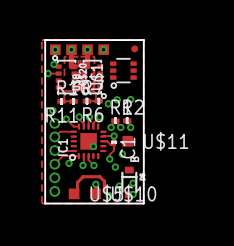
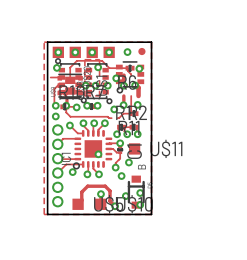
track: (71, 49) (71, 66) (74, 66) -> none
track: (87, 49) (87, 66) (84, 66) -> none
via: none -> (127, 52)
zone outline: (64, 56) (78, 56) (78, 90) (64, 90) (64, 56) -> none
via: none -> (98, 67)
track: none -> (115, 68) (109, 68) (102, 60) (76, 60) (70, 67) (70, 80) (72, 78) (80, 78)
track: none -> (121, 68) (127, 68) (131, 75)
via: none -> (139, 68)
track: (100, 66) (93, 69) (93, 90) (96, 93) (96, 101) (89, 101) -> none
track: none -> (123, 75) (123, 85) (125, 85)
via: (48, 73) -> none
via: none -> (116, 78)
track: none -> (59, 85) (54, 89) (55, 105)
via: none -> (85, 85)
via: none -> (95, 85)
via: none -> (107, 85)
via: none -> (123, 85)
track: none -> (135, 85) (138, 87) (138, 95)
via: none -> (135, 85)
part: none -> (72, 88)
track: none -> (70, 91) (66, 95) (66, 112) (70, 116) (111, 118)
track: none -> (123, 95) (123, 100)
track: none -> (131, 95) (131, 113) (123, 113) (117, 118)
via: none -> (55, 105)
via: none -> (66, 105)
via: none -> (87, 105)
via: none -> (97, 105)
via: none -> (76, 107)
R11 position: (73, 101) -> (134, 113)
R6 position: (98, 101) -> (130, 68)
track: none -> (124, 127) (131, 127)

